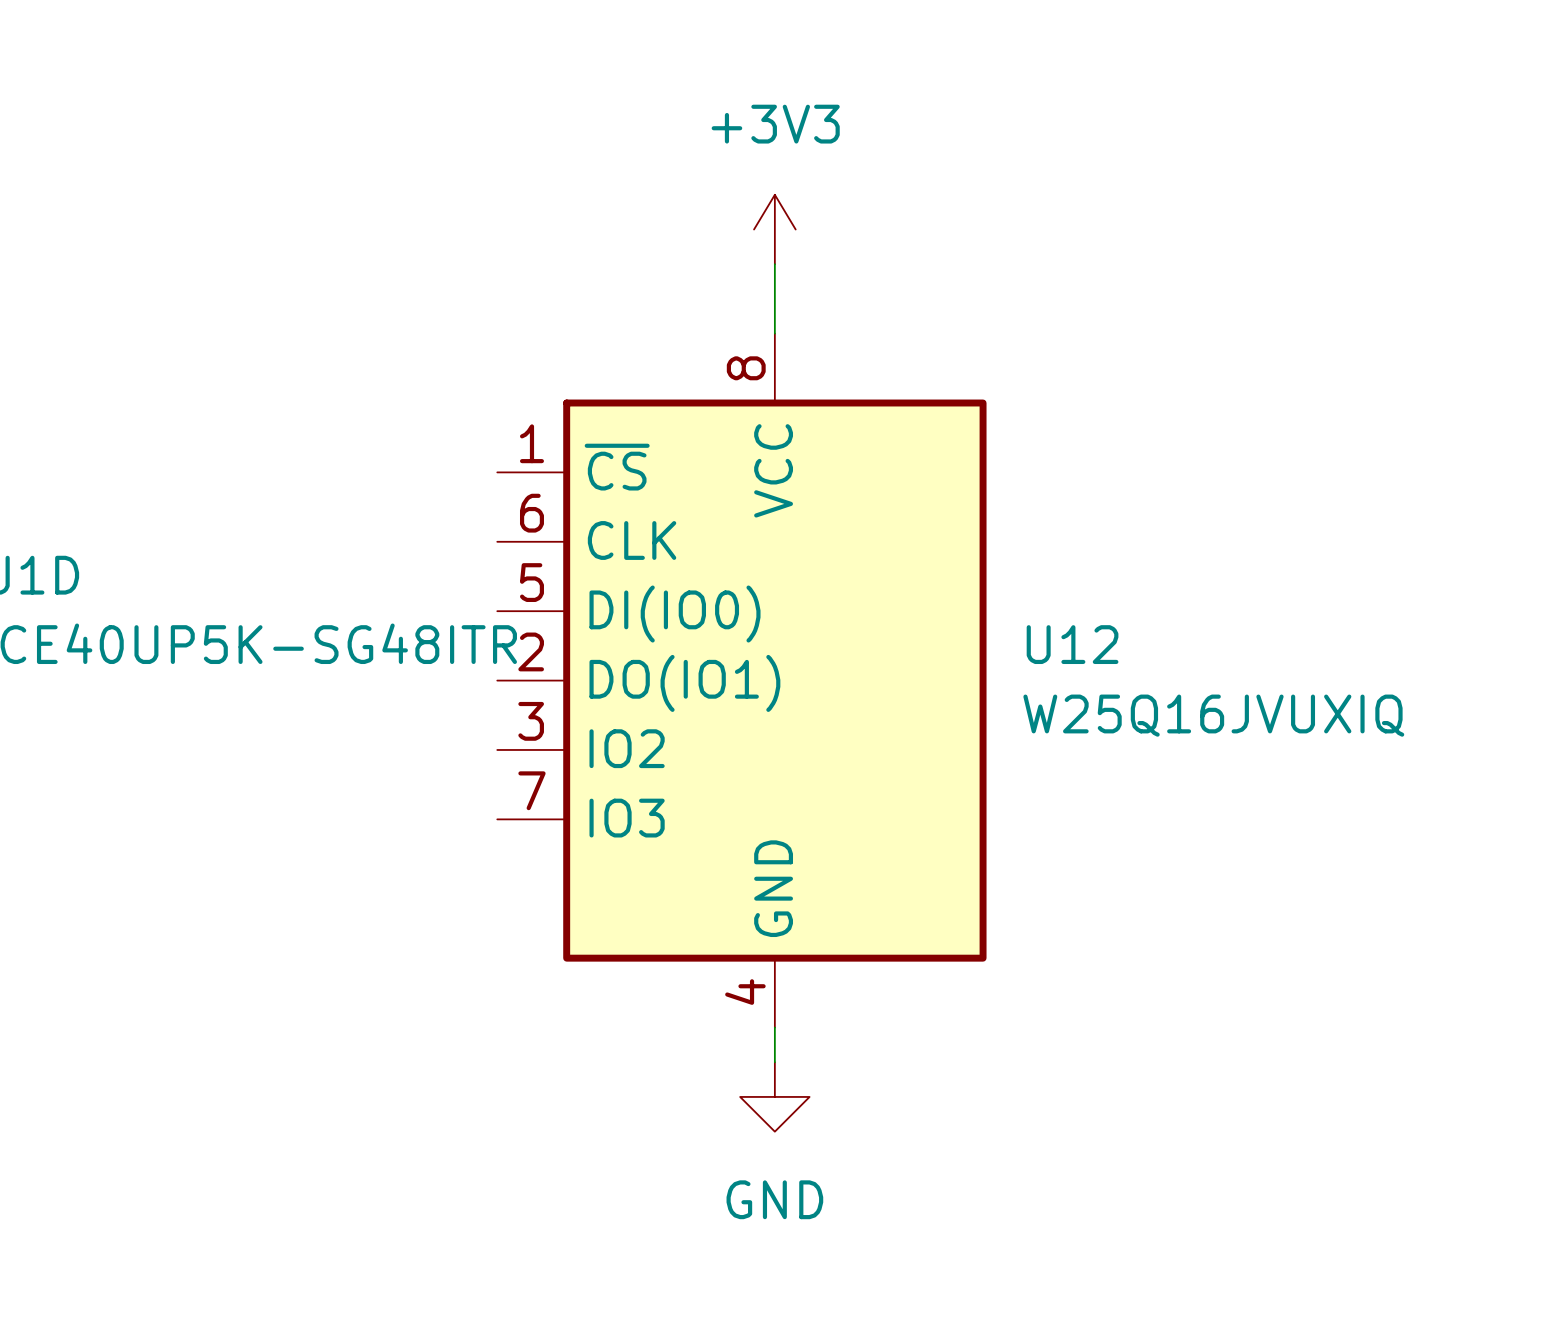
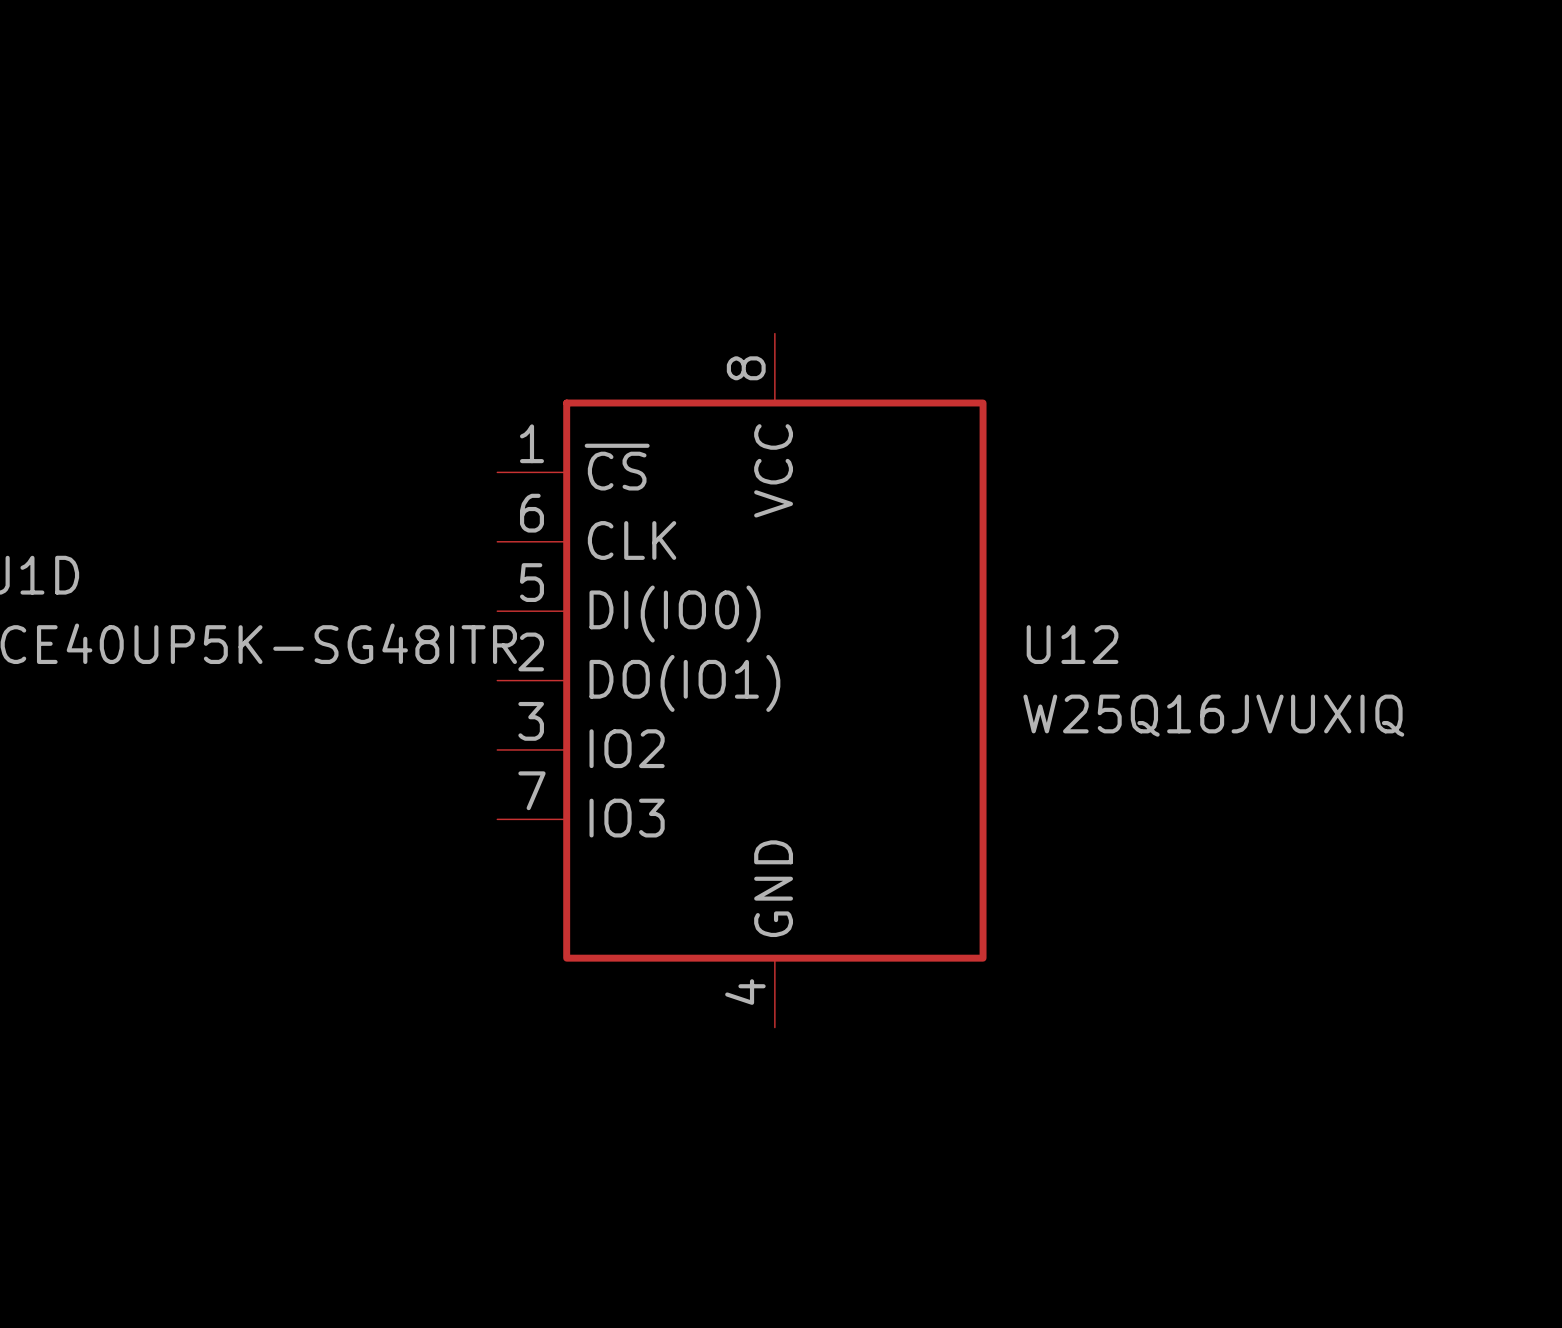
power symbol: +3V3 (774, 229) -> none
wire: (774, 264) (774, 333) -> none
wire: (774, 1027) (774, 1062) -> none
power symbol: GND (774, 1096) -> none

